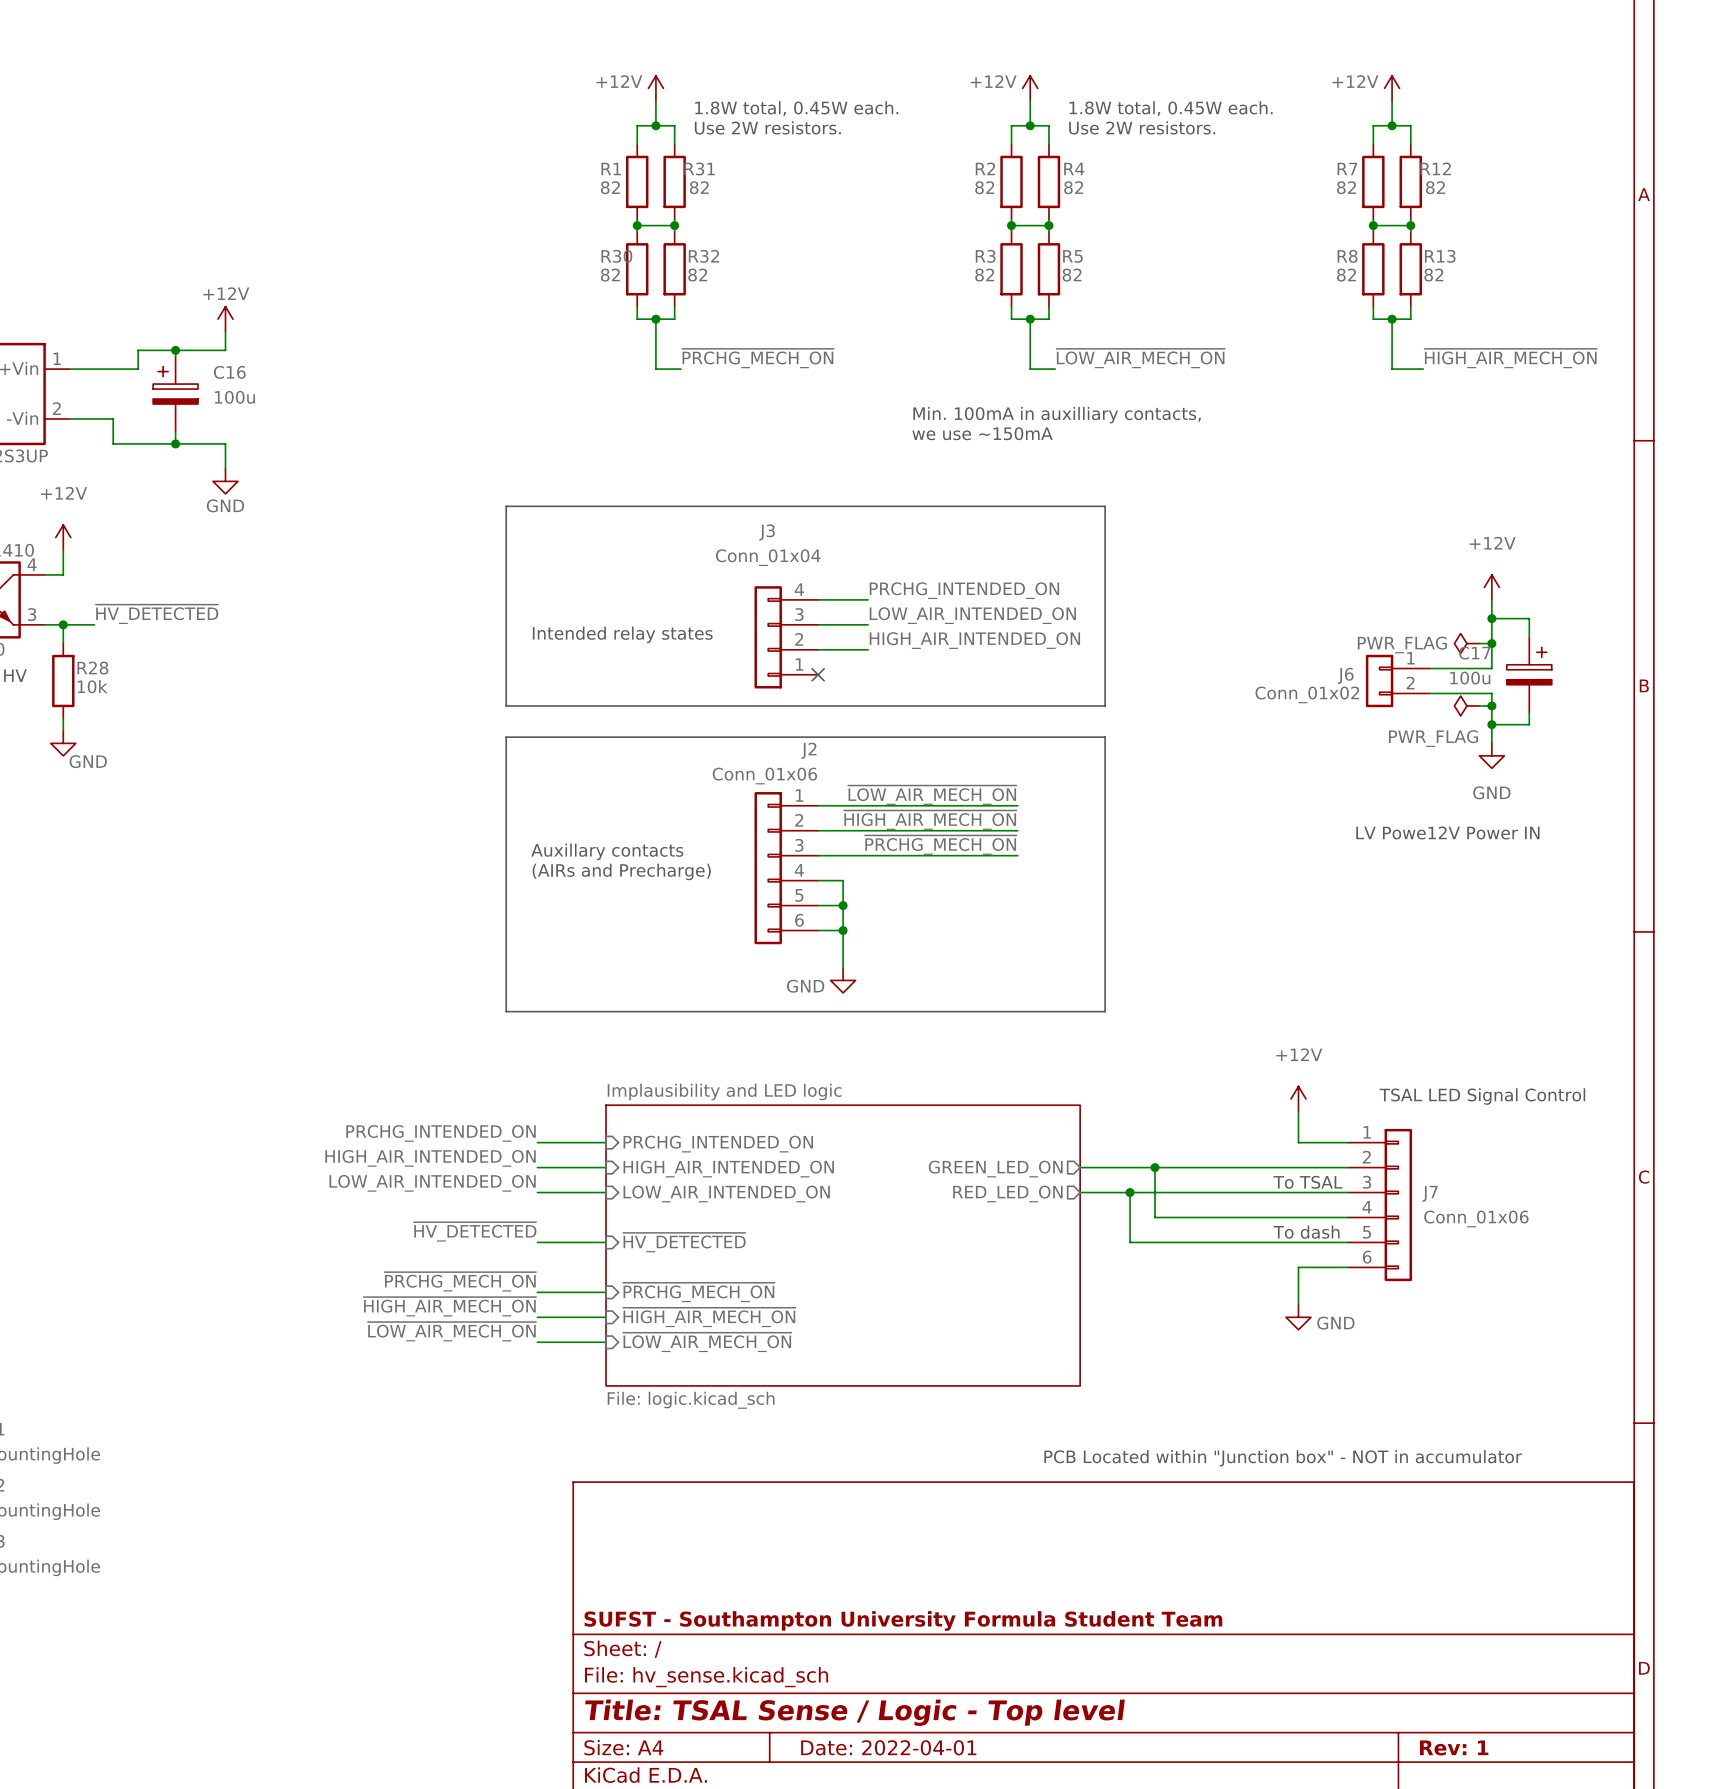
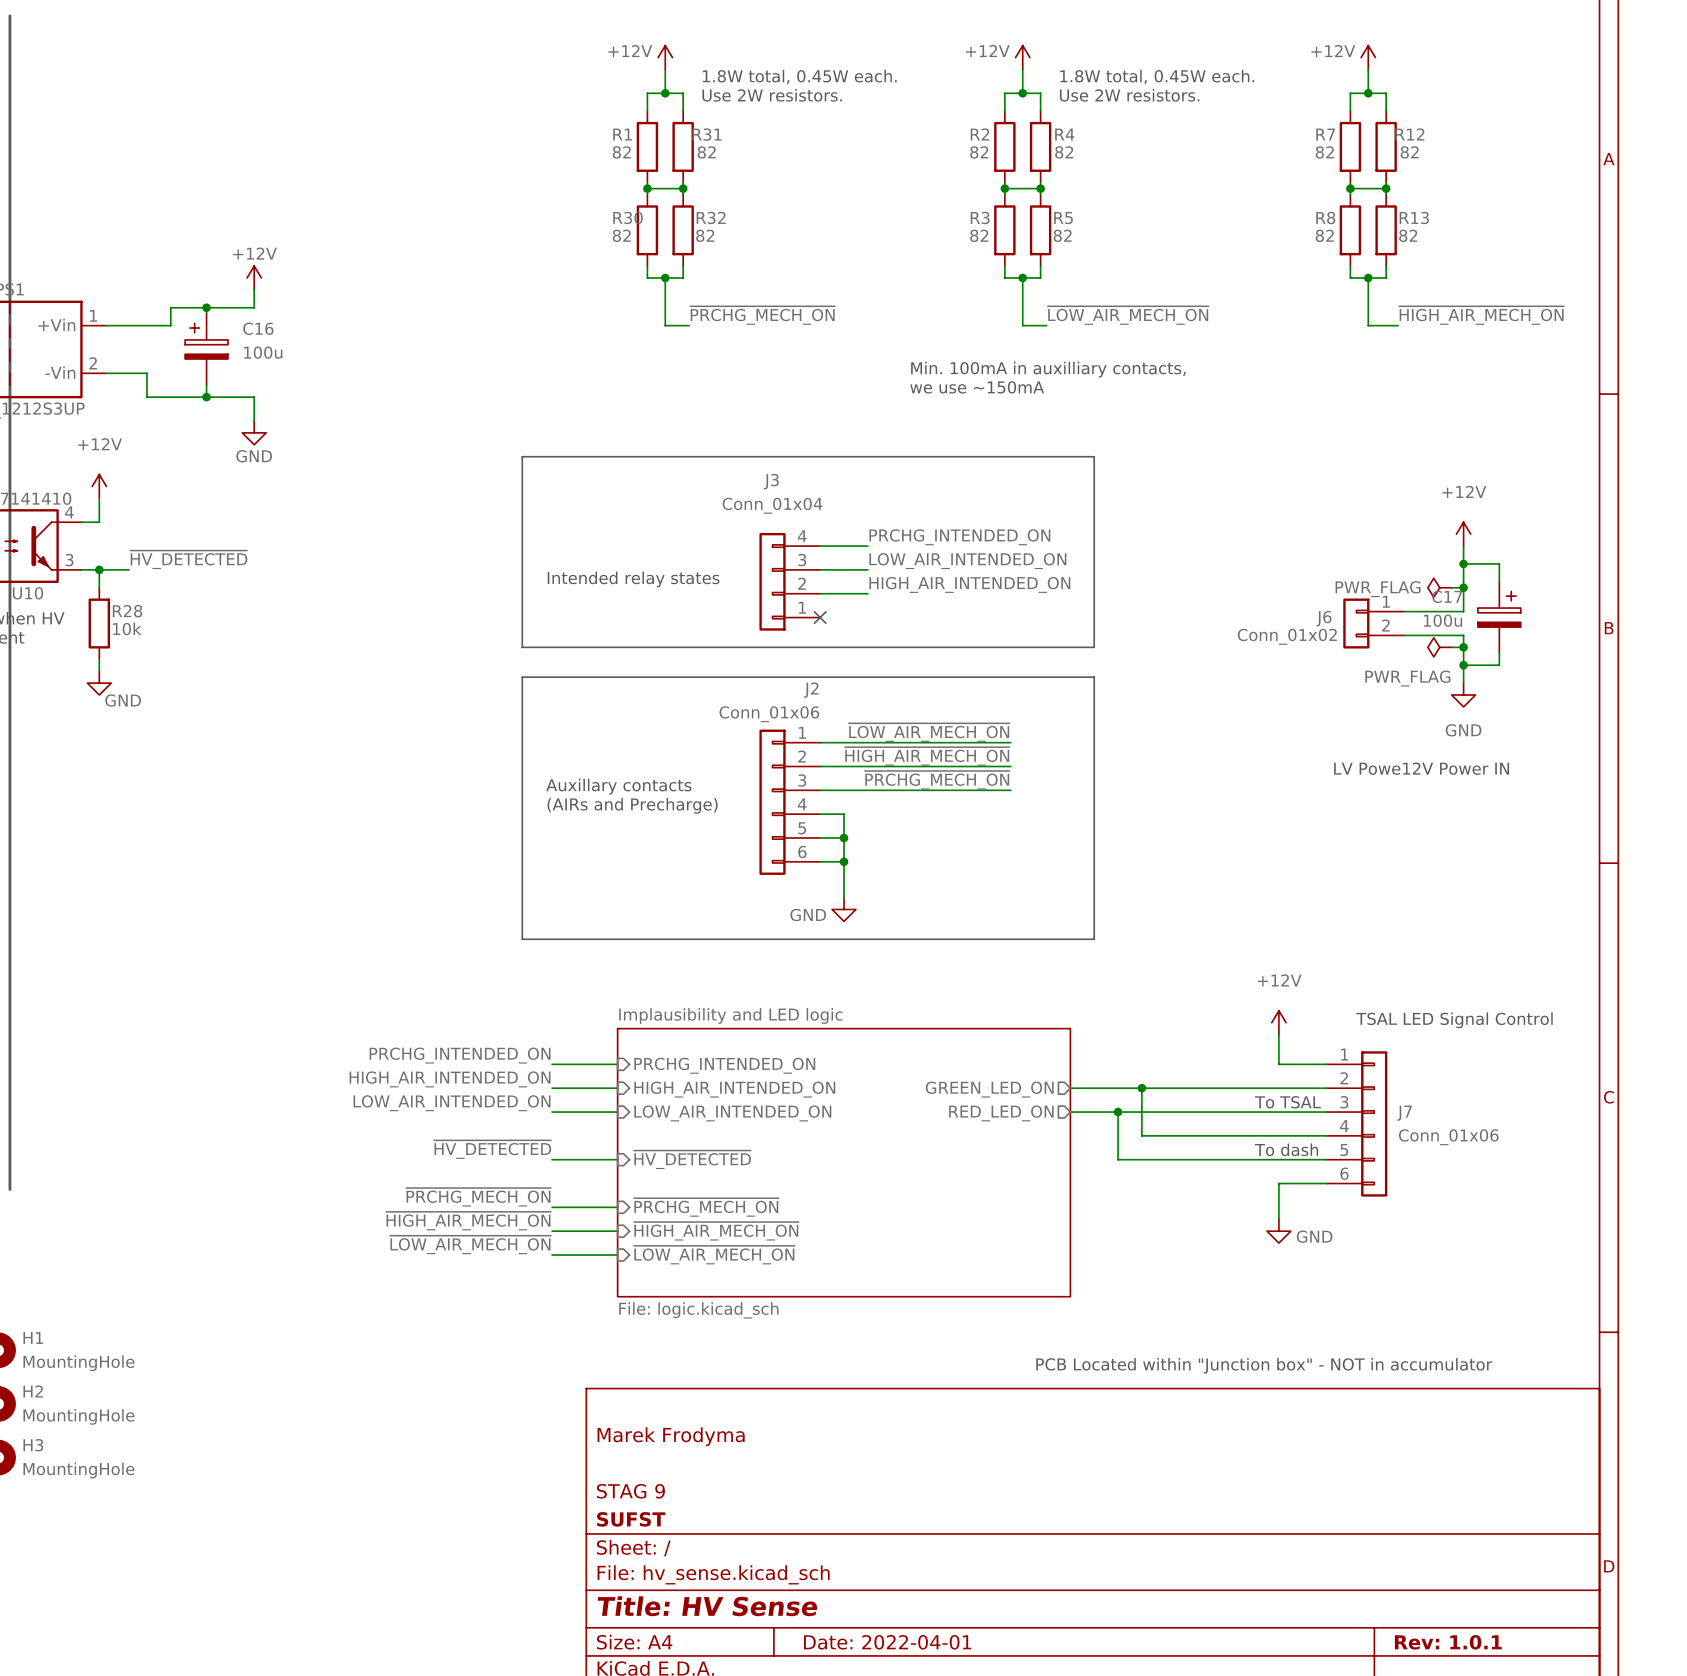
title block: none -> Marek Frodyma (671, 1436)
title block: none -> STAG 9 (630, 1491)
title block: SUFST - Southampton University Formula Student Team (903, 1620) -> SUFST (631, 1519)
title block: Title: TSAL Sense / Logic - Top level (855, 1712) -> Title: HV Sense (707, 1606)
title block: Rev: 1 (1454, 1747) -> Rev: 1.0.1 (1448, 1642)

